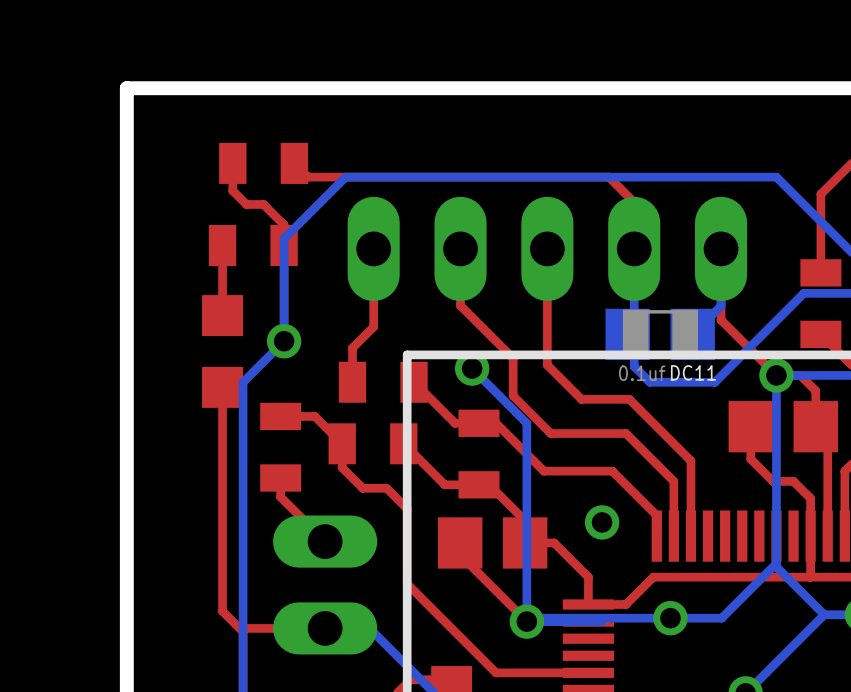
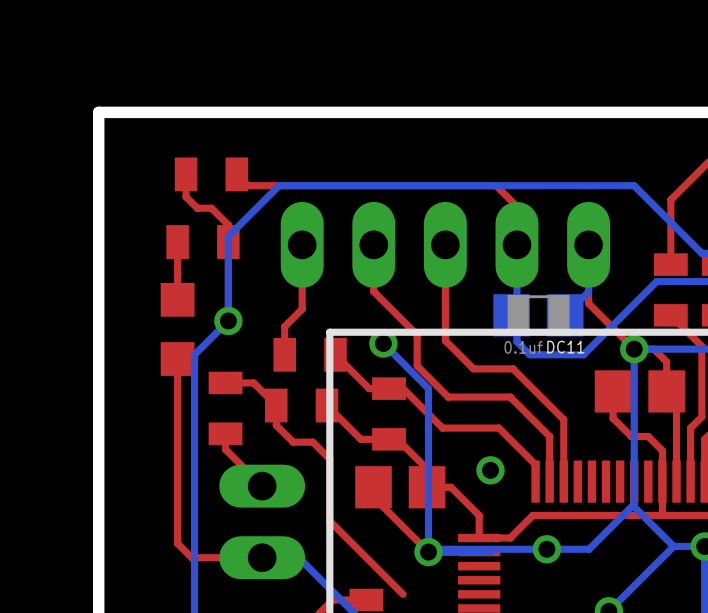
top track: (588, 672) (496, 672) -> none

